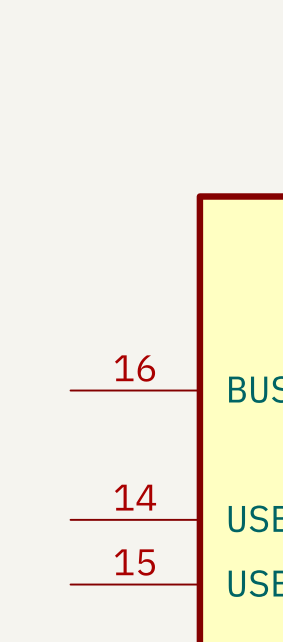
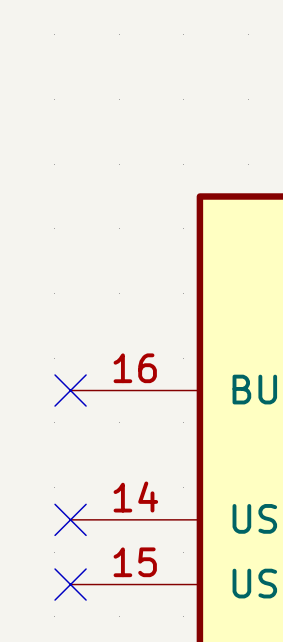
no-connect mark: none -> (70, 390)
no-connect mark: none -> (70, 519)
no-connect mark: none -> (70, 584)

